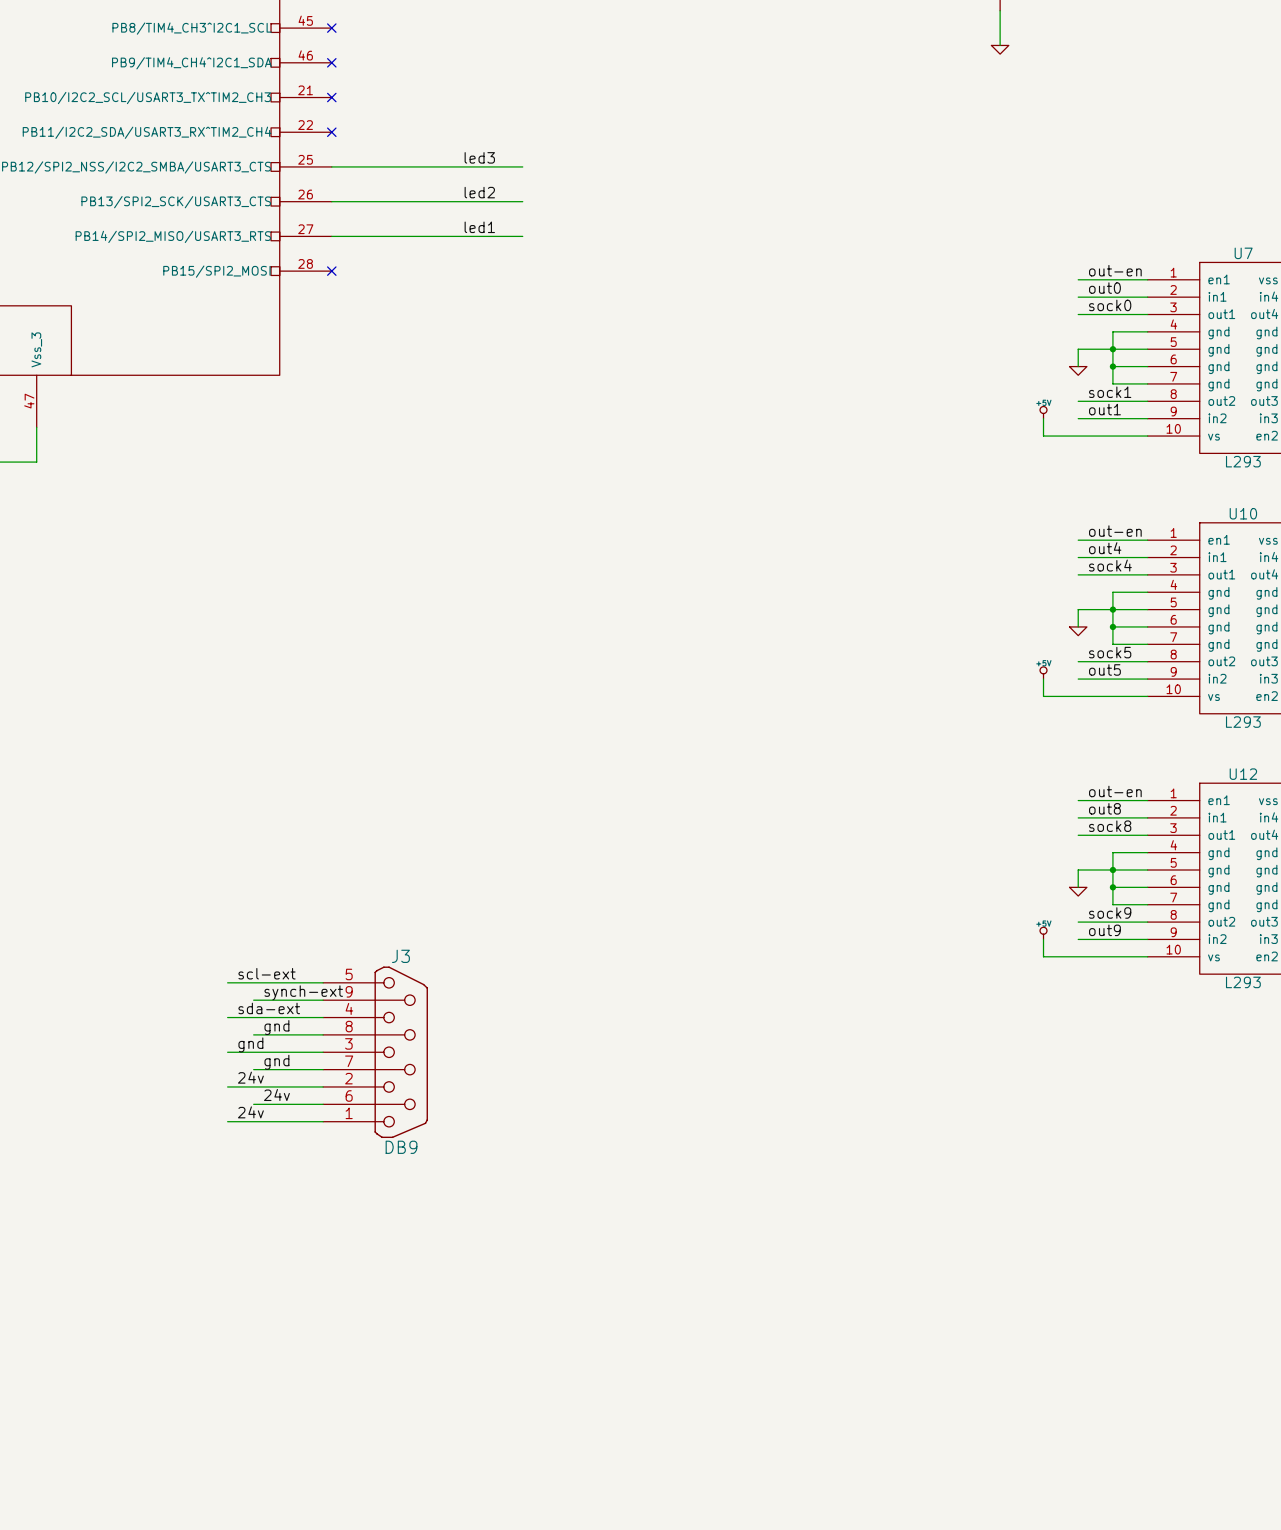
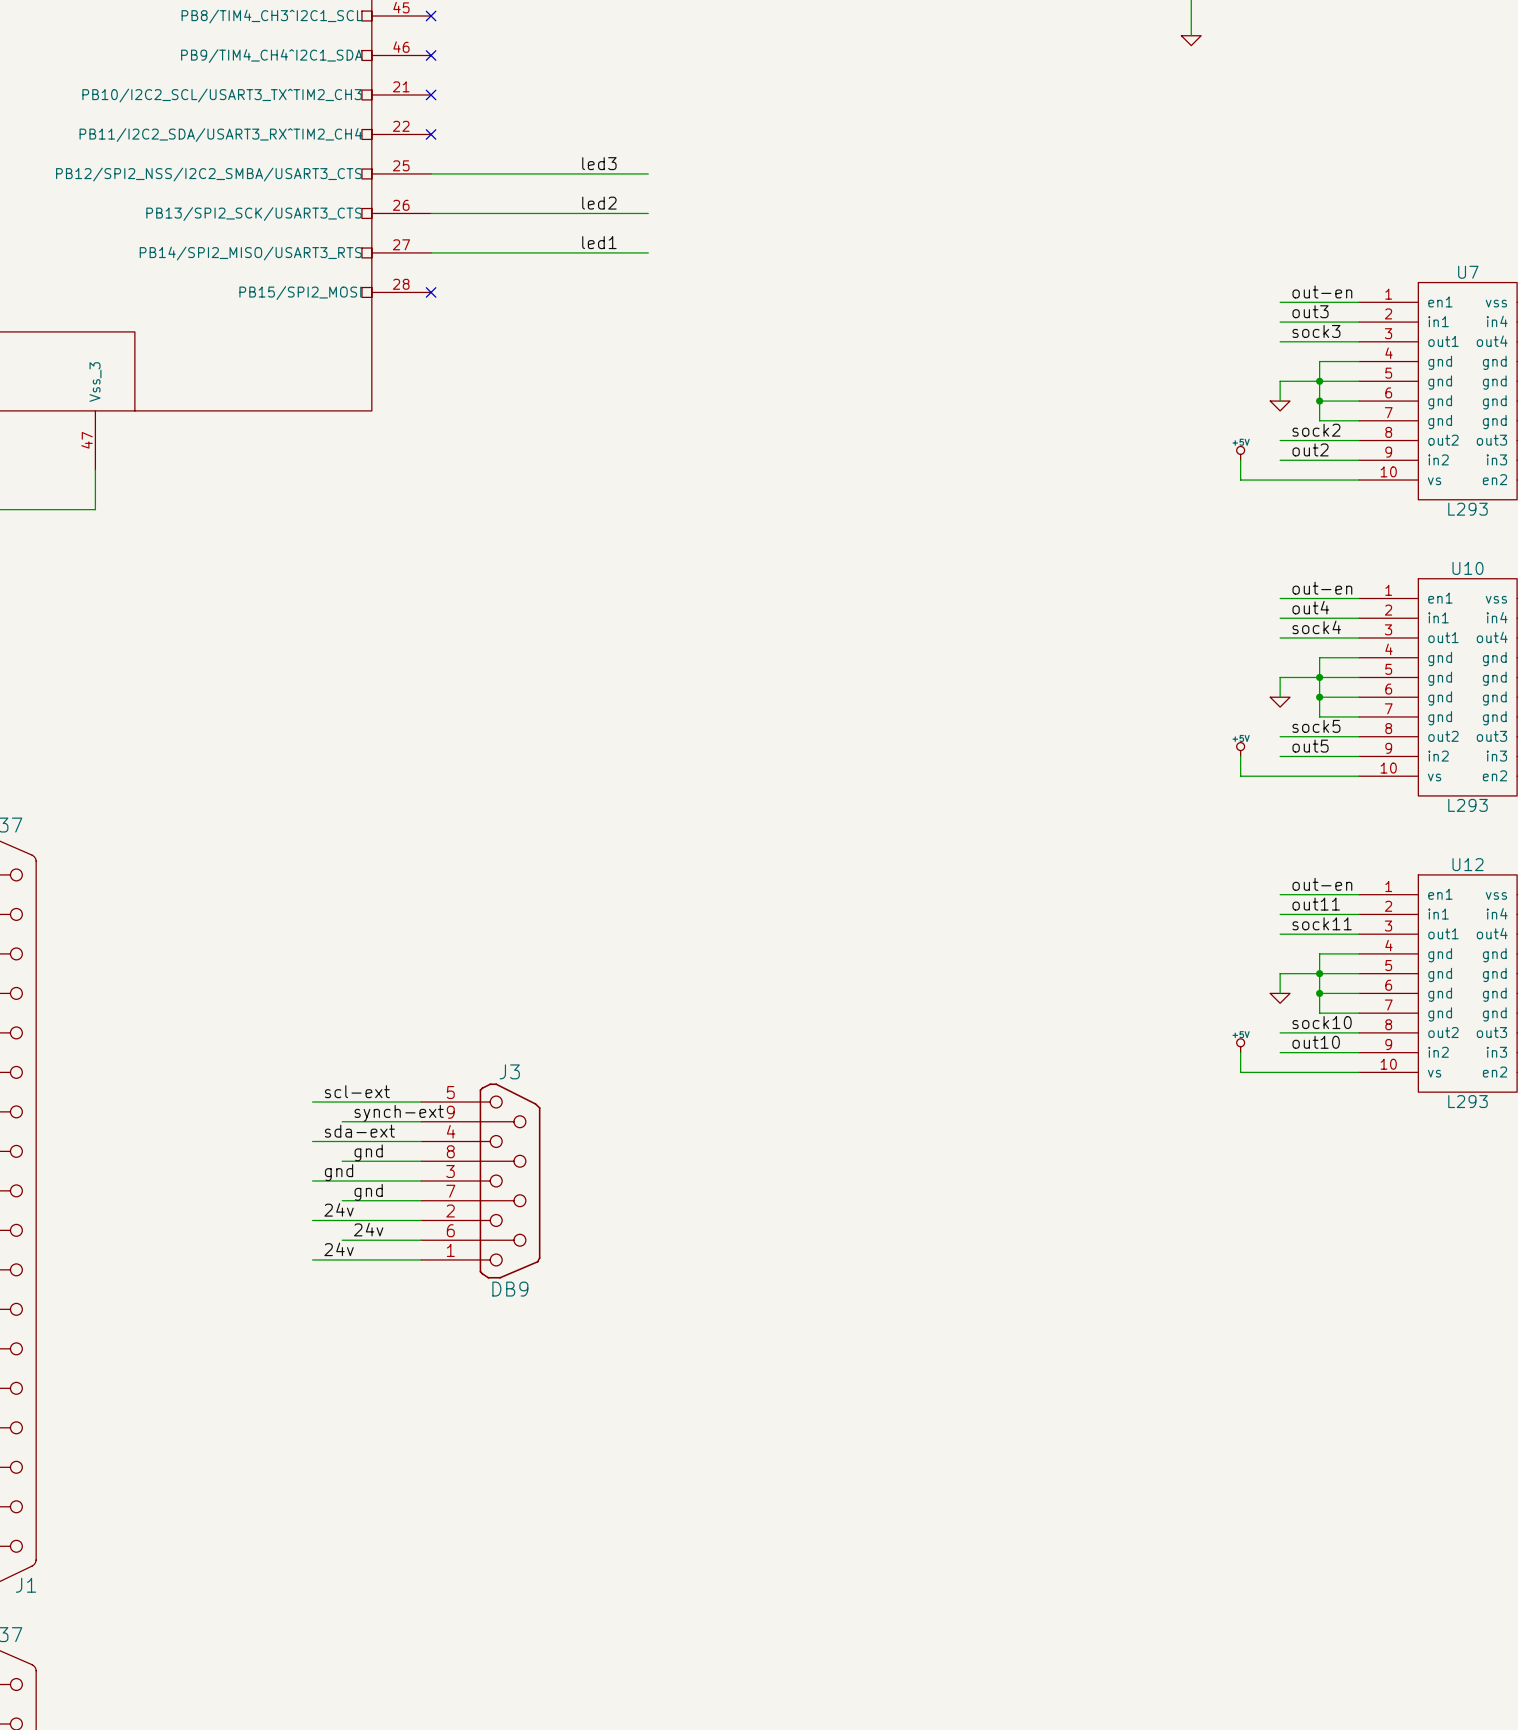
label: out0 (1104, 288) -> out3 (1310, 311)
label: sock0 (1110, 305) -> sock3 (1316, 331)
label: sock1 (1110, 392) -> sock2 (1316, 430)
label: out1 (1104, 409) -> out2 (1310, 449)
label: out8 (1104, 808) -> out11 (1316, 904)
label: sock8 (1110, 826) -> sock11 (1322, 923)
label: sock9 (1110, 912) -> sock10 (1322, 1022)
label: out9 (1104, 930) -> out10 (1316, 1042)

